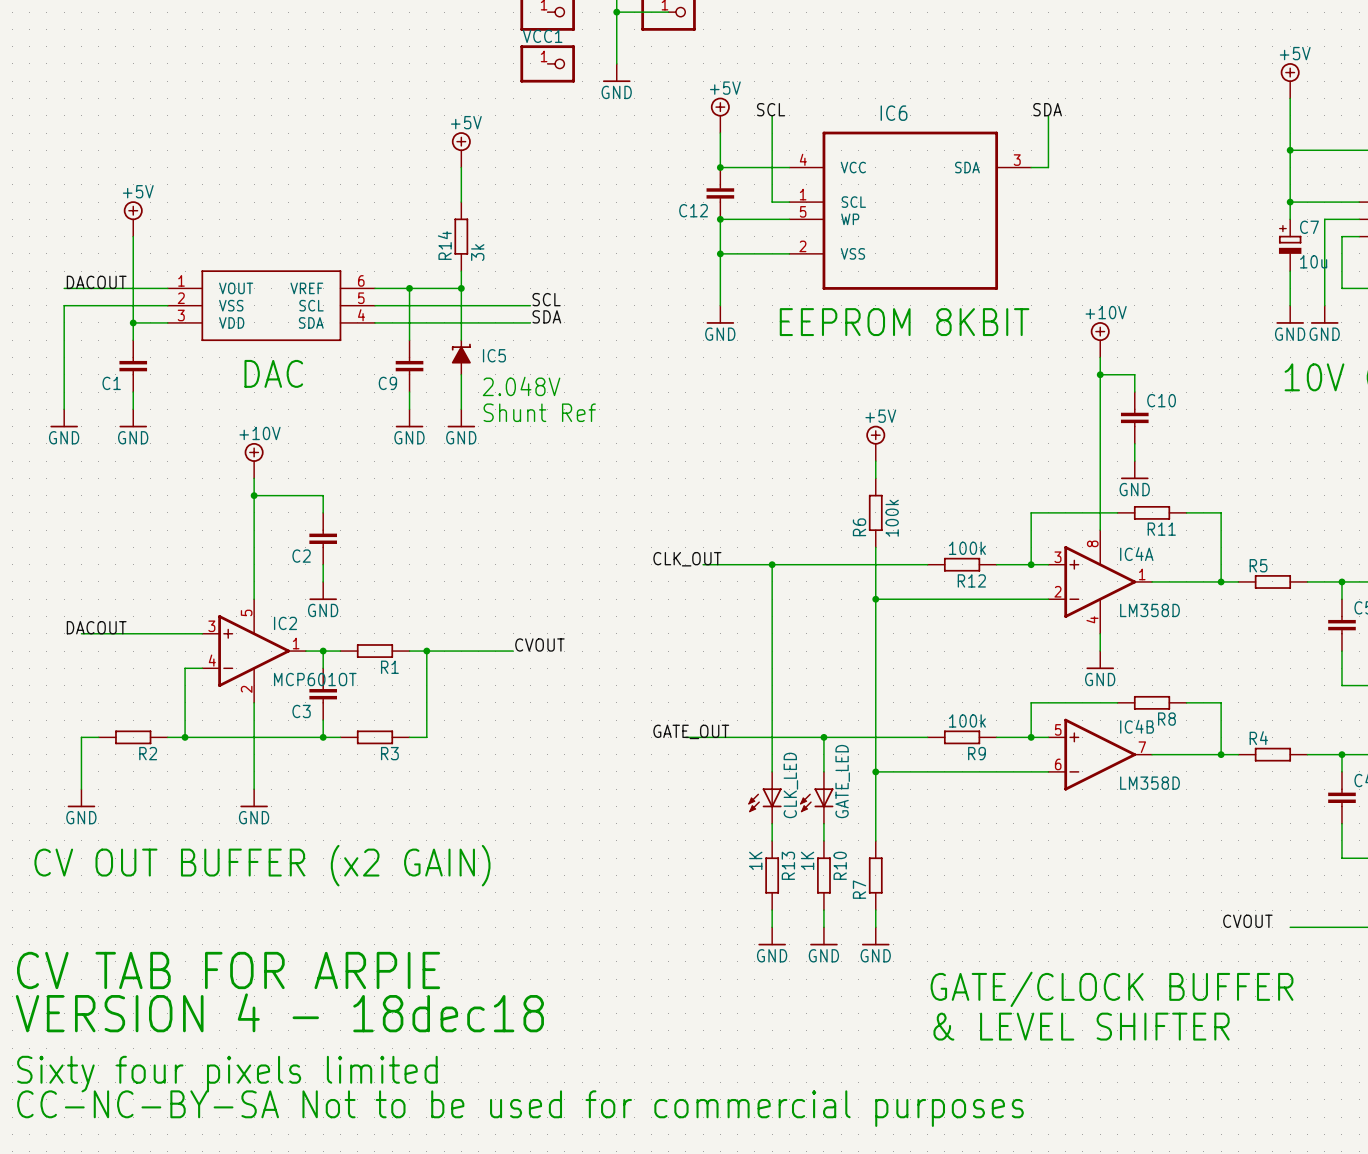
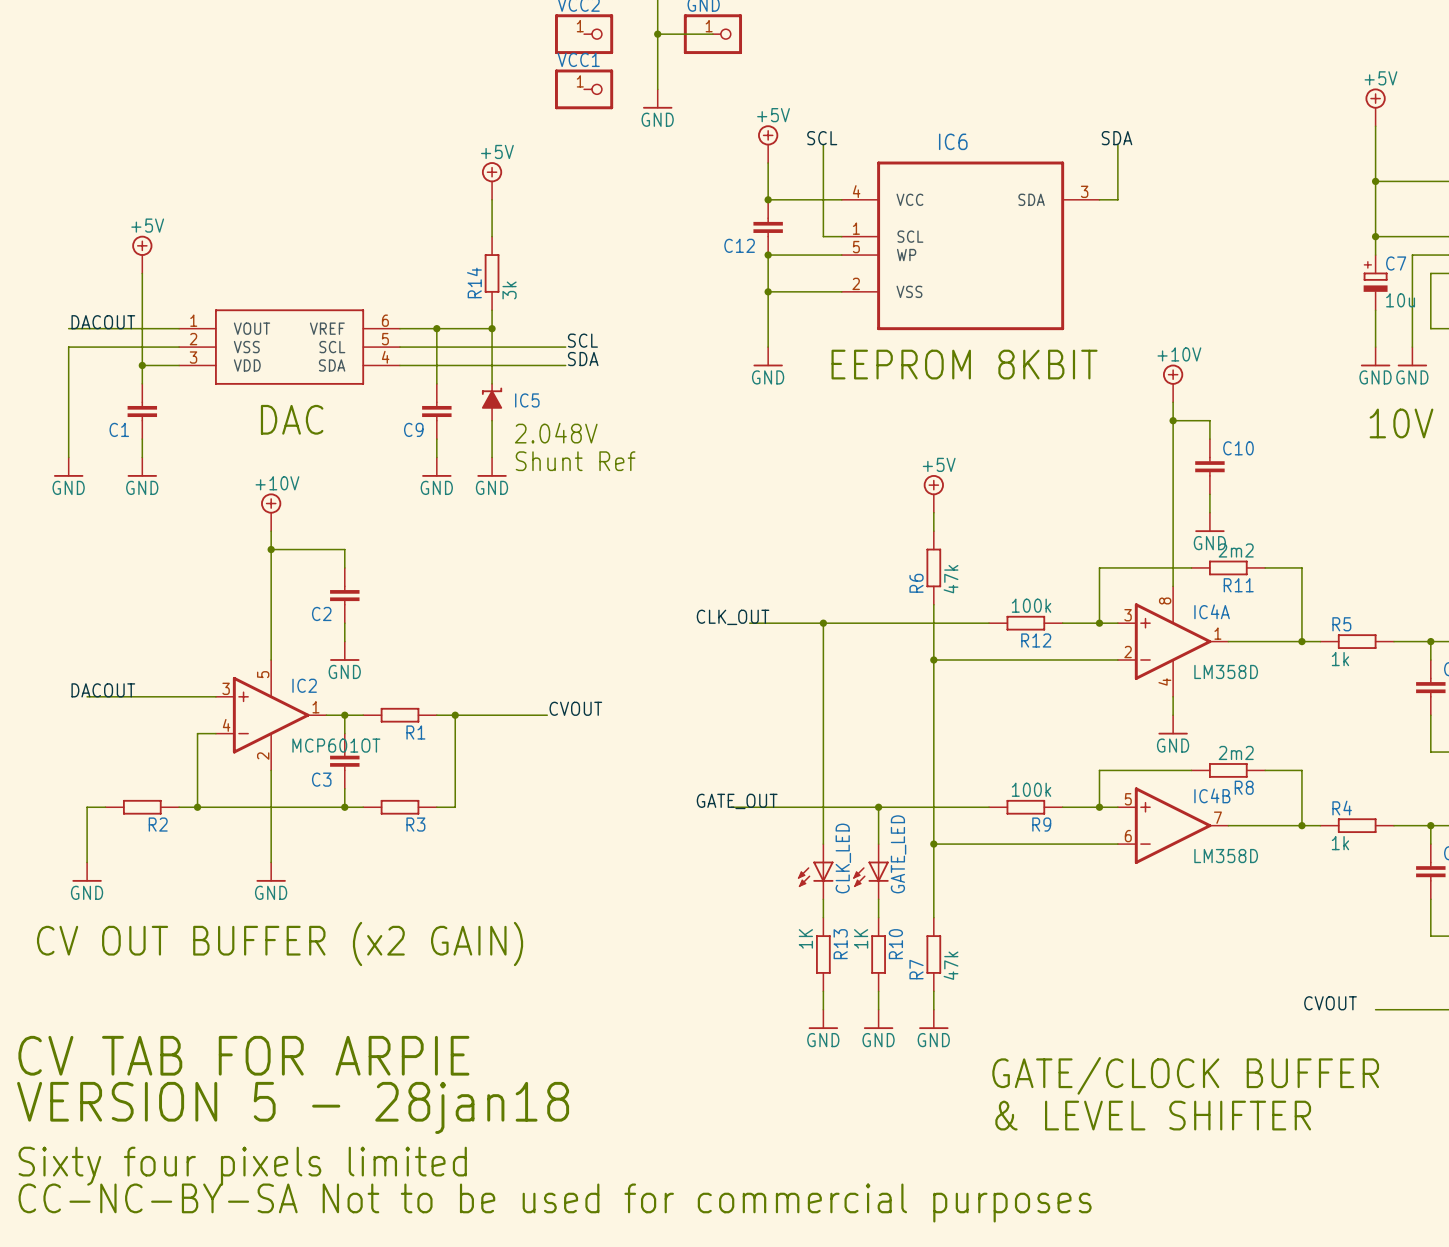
R11 value: none -> 2m2 (1236, 550)
R6 value: 100k (892, 518) -> 47k (951, 579)
R5 value: none -> 1k (1340, 659)
R8 value: none -> 2m2 (1236, 752)
R4 value: none -> 1k (1340, 843)
R7 value: none -> 47k (951, 965)
text: VERSION 4 - 18dec18 (279, 1012) -> VERSION 5 - 28jan18 (293, 1107)

